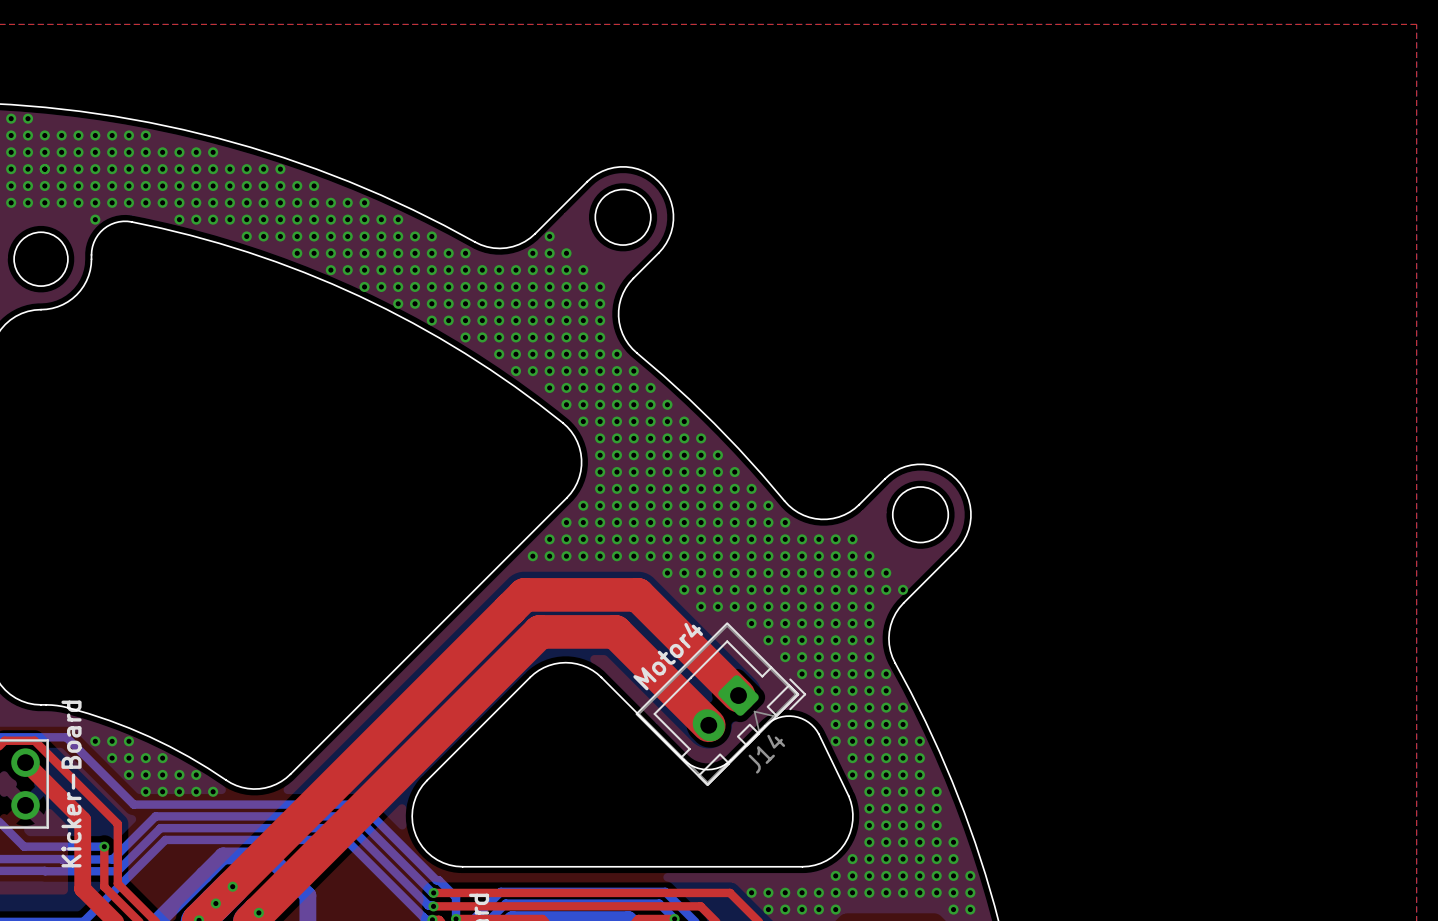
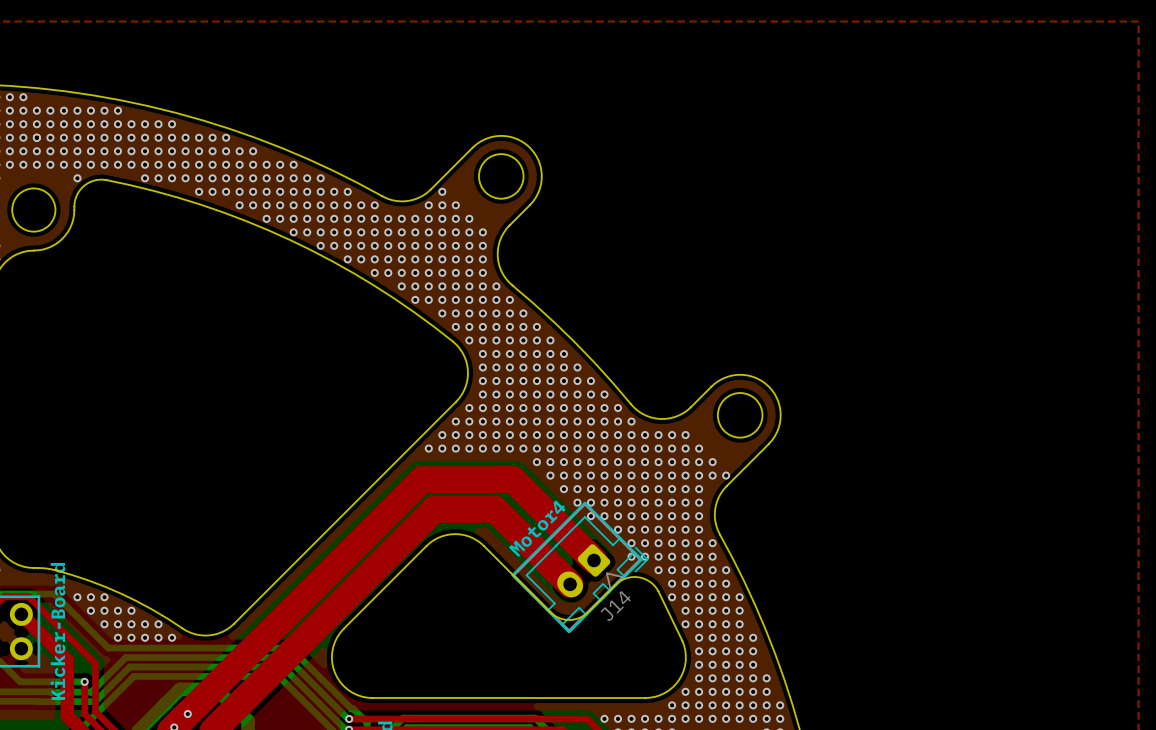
via: none -> (577, 502)
via: none -> (590, 502)
via: none -> (590, 516)
via: none -> (604, 516)
via: none -> (618, 529)
via: none -> (631, 543)
via: none -> (631, 556)
via: none -> (645, 556)

